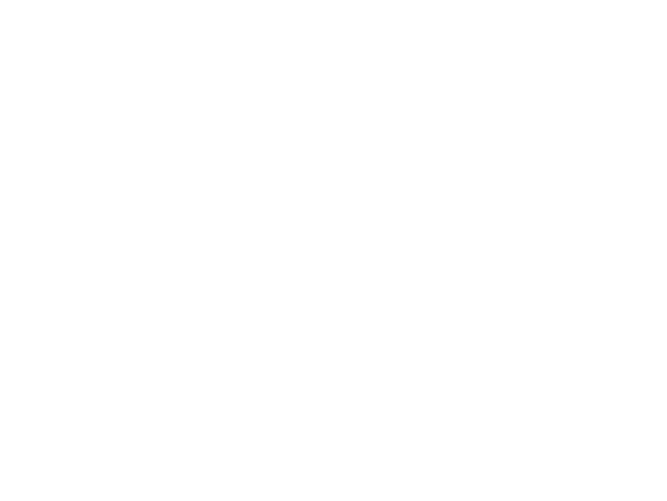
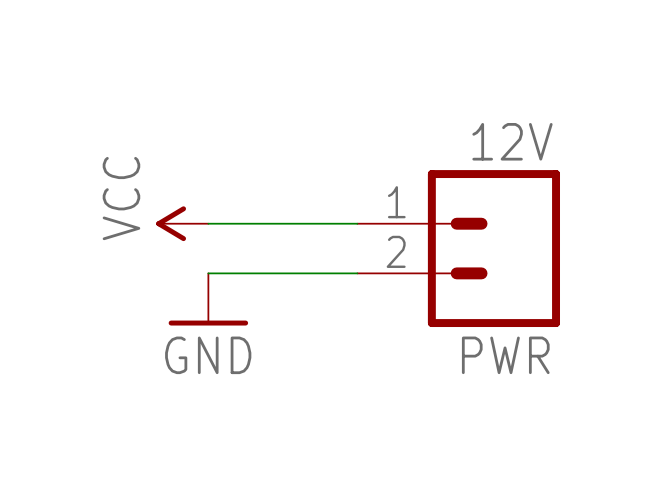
power symbol: none -> VCC (182, 223)
wire: none -> (208, 223) (357, 223)
PWR: none -> 12V (458, 248)
wire: none -> (208, 273) (357, 273)
power symbol: none -> GND (208, 299)

